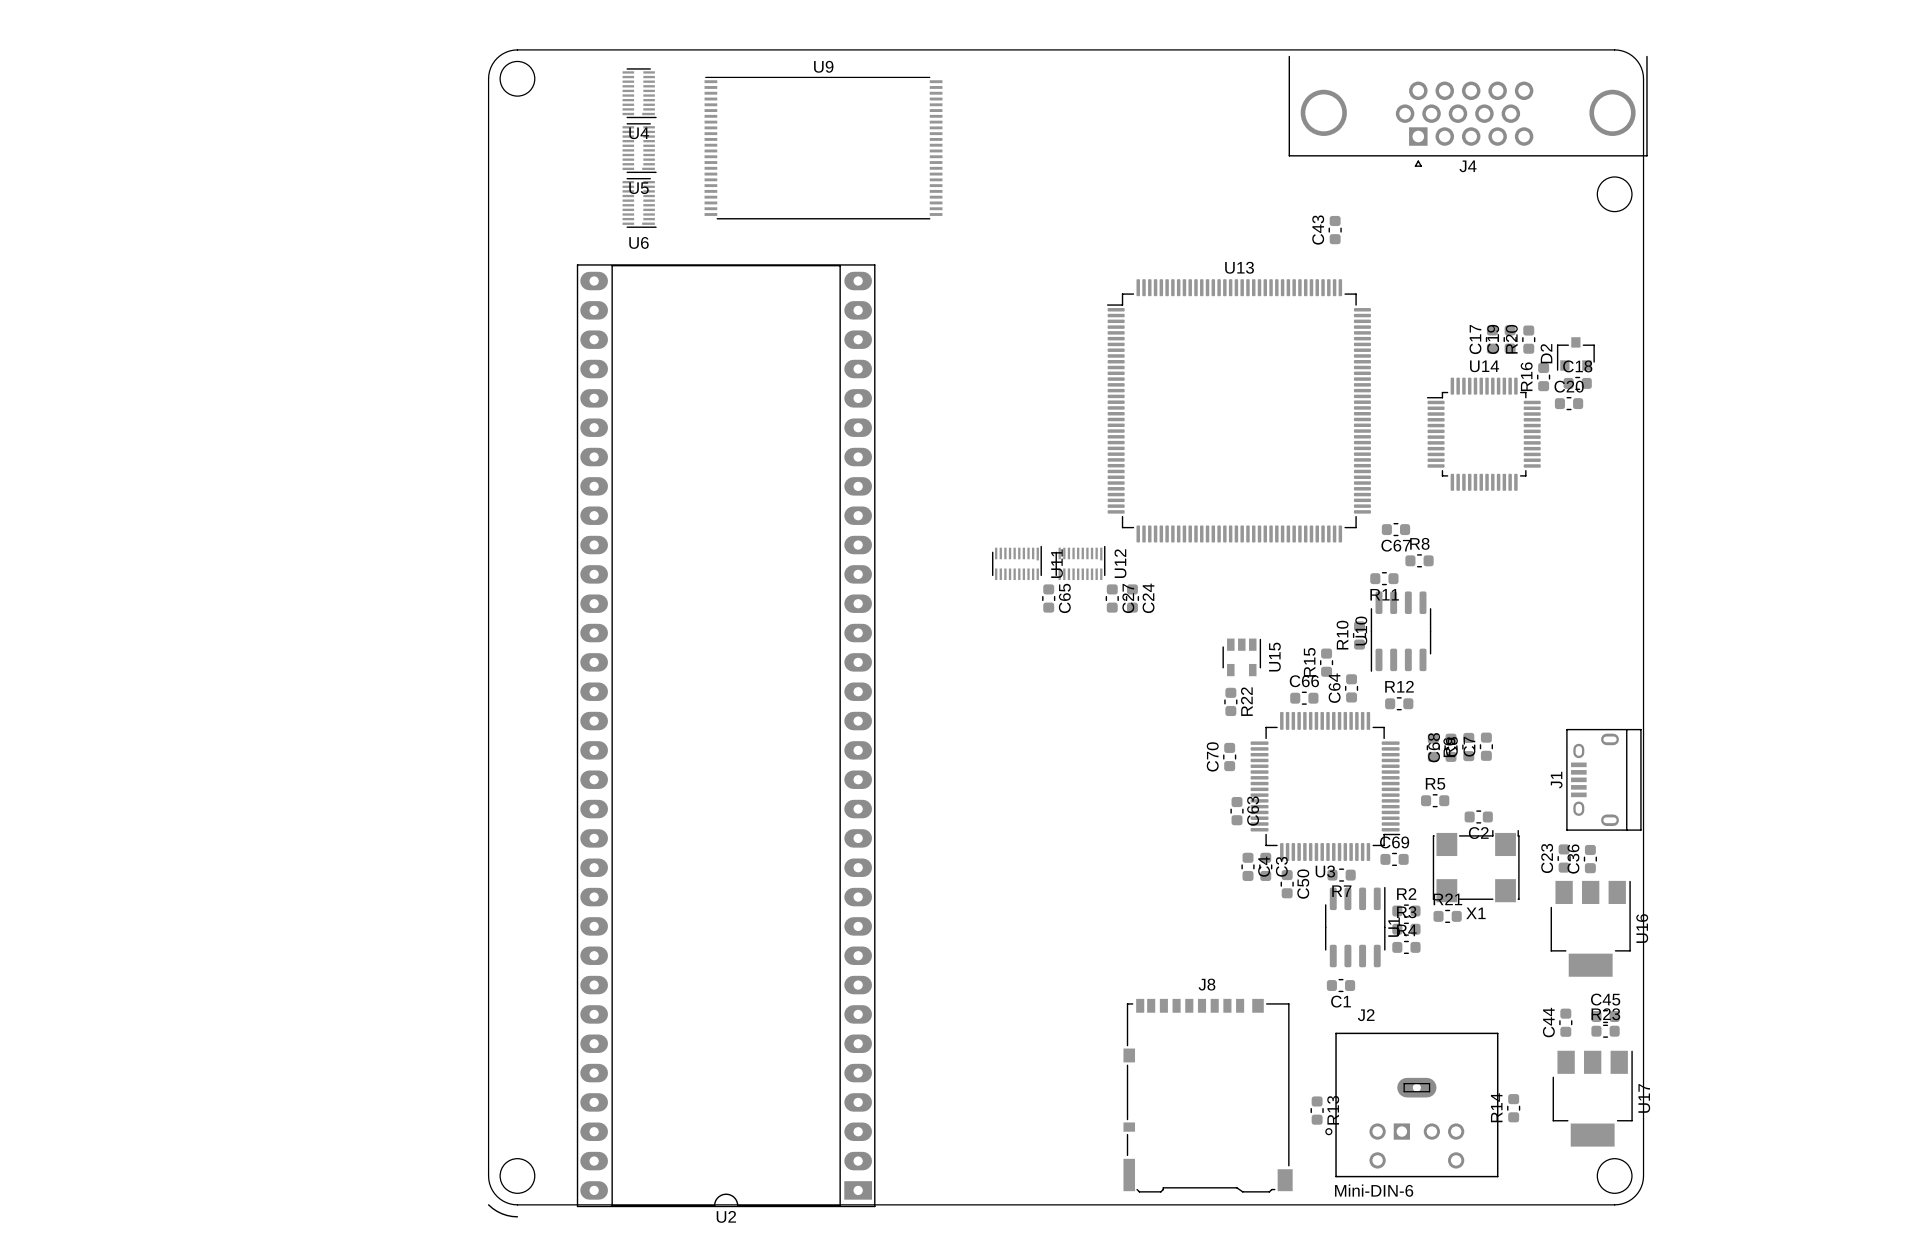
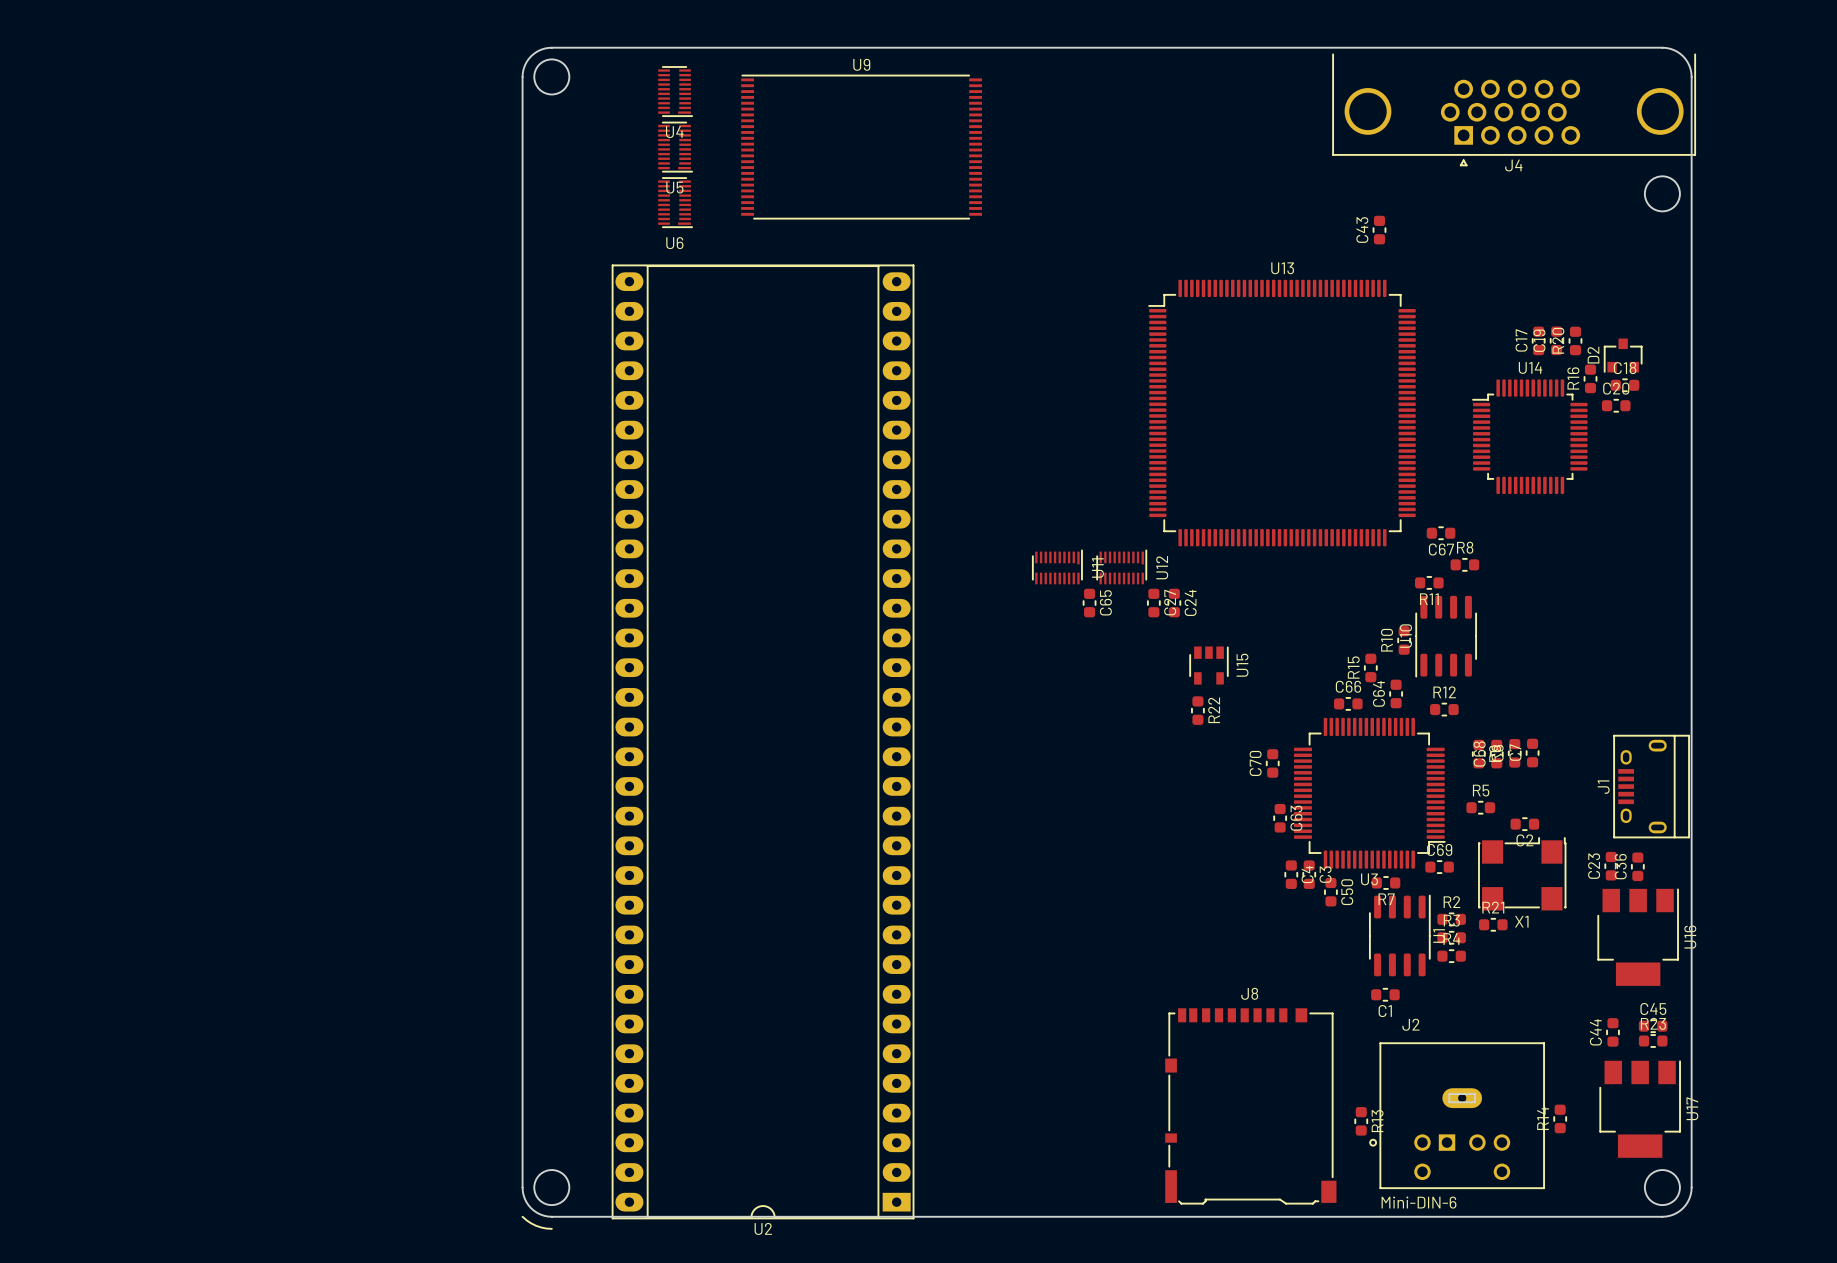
U15 position: (1241, 657) -> (1208, 665)
R22 position: (1230, 701) -> (1197, 710)

